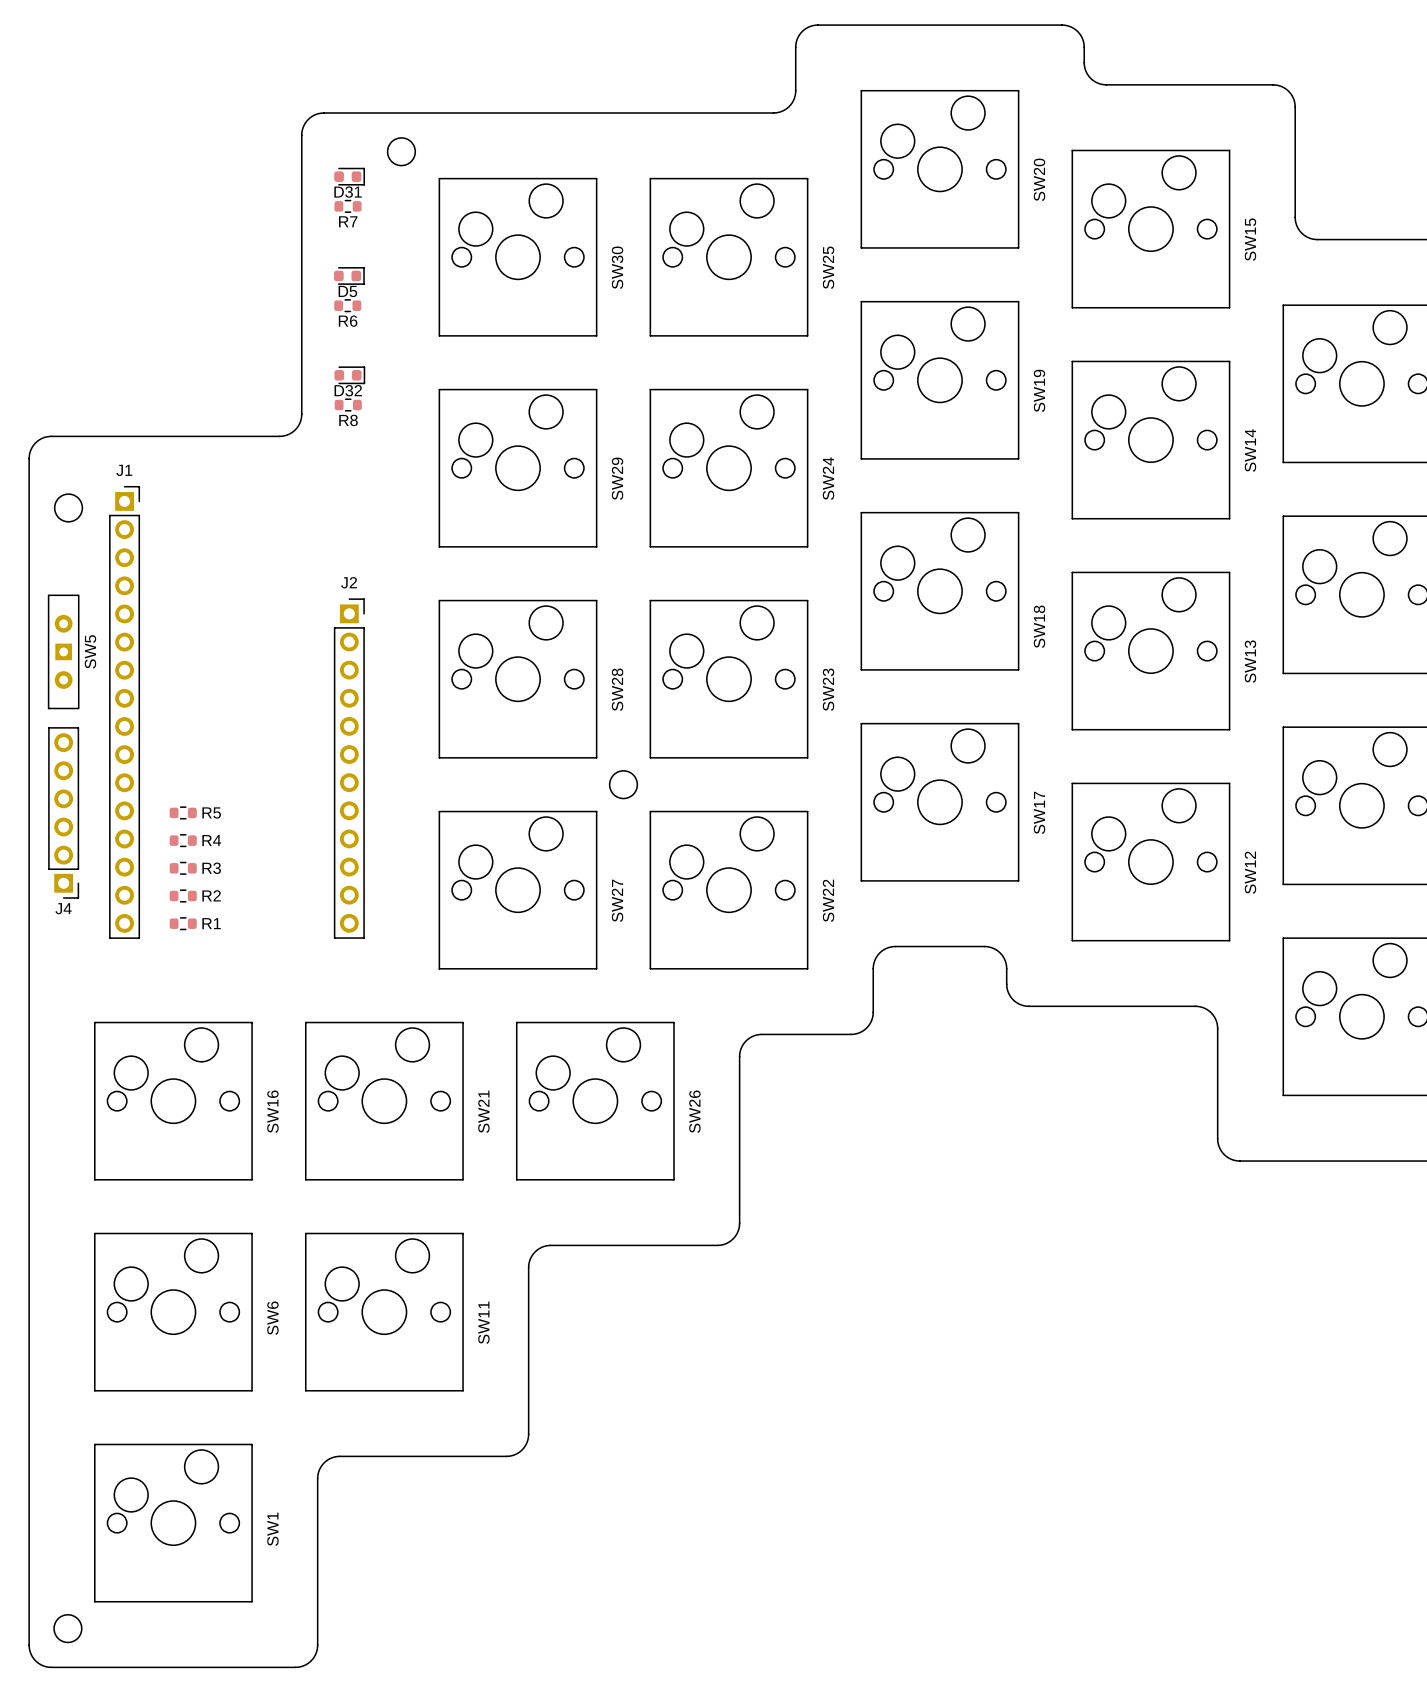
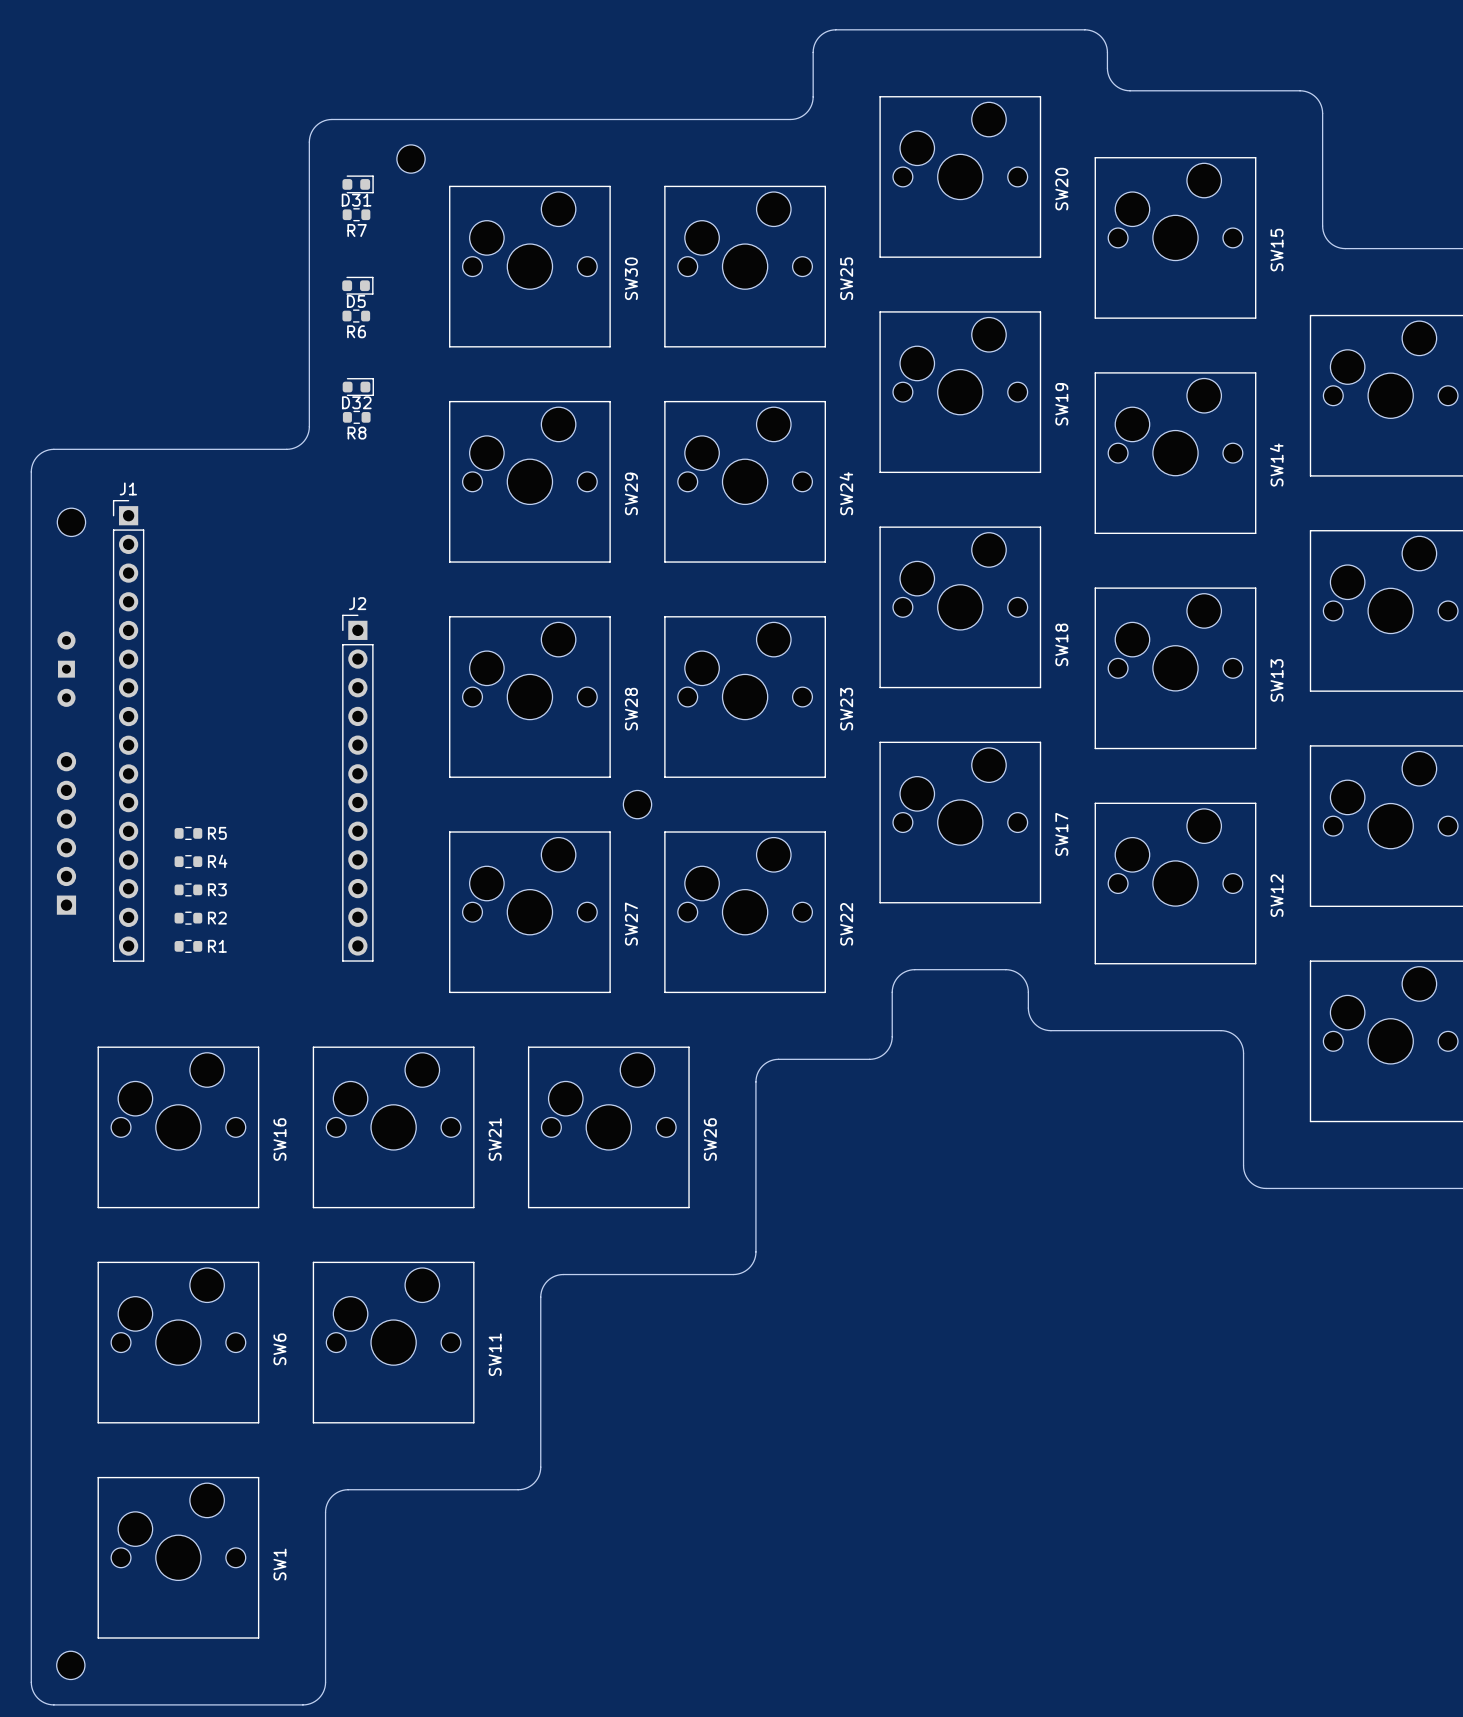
J1 footprint: [109, 486, 140, 939] -> [112, 500, 145, 962]
J2 footprint: [333, 598, 365, 939] -> [342, 614, 374, 962]
SW5 side: top (63, 651) -> bottom (66, 669)
J4 side: top (63, 812) -> bottom (66, 833)

